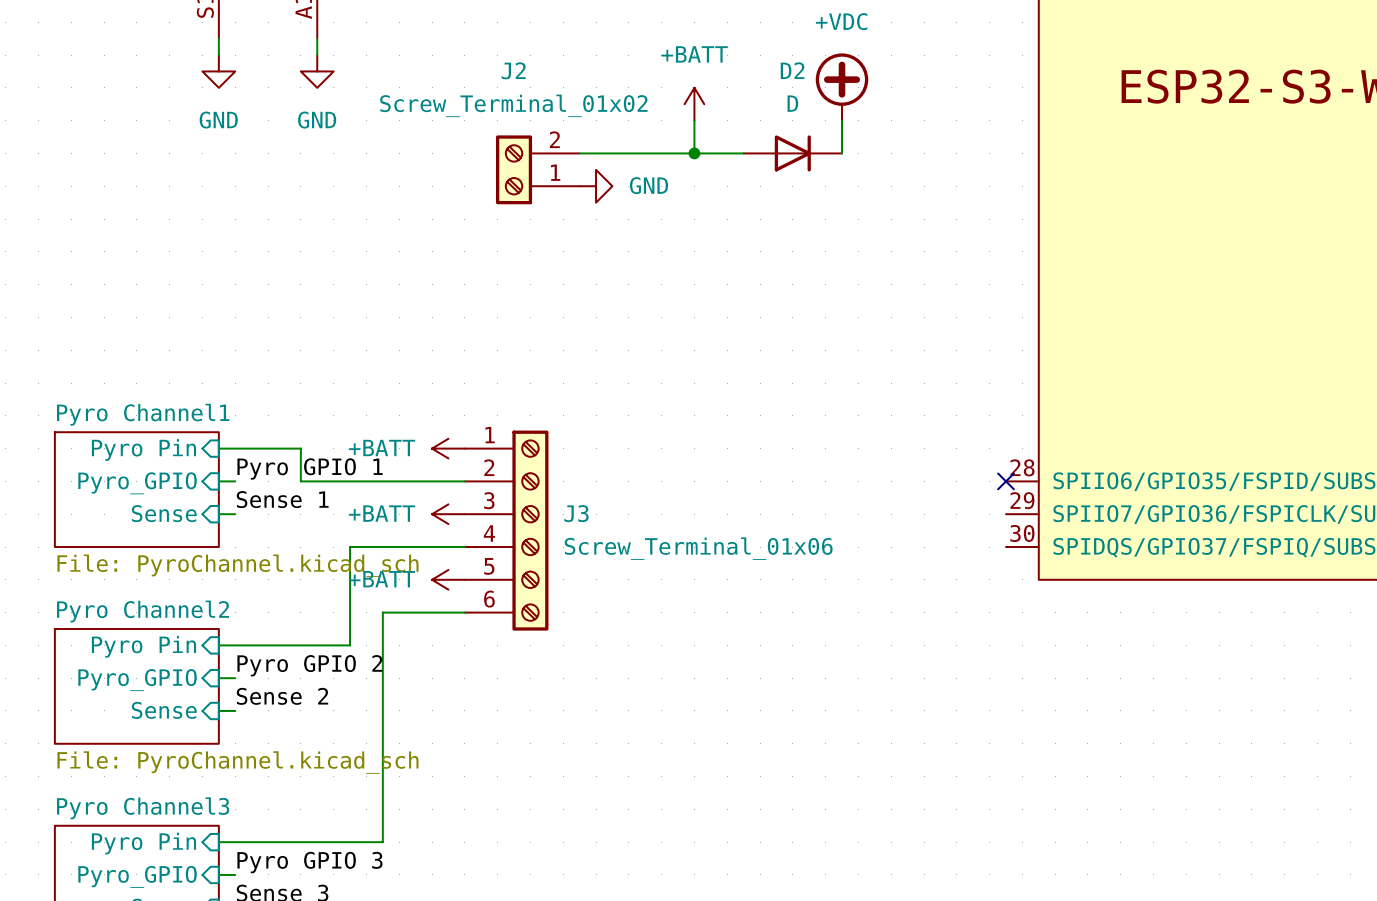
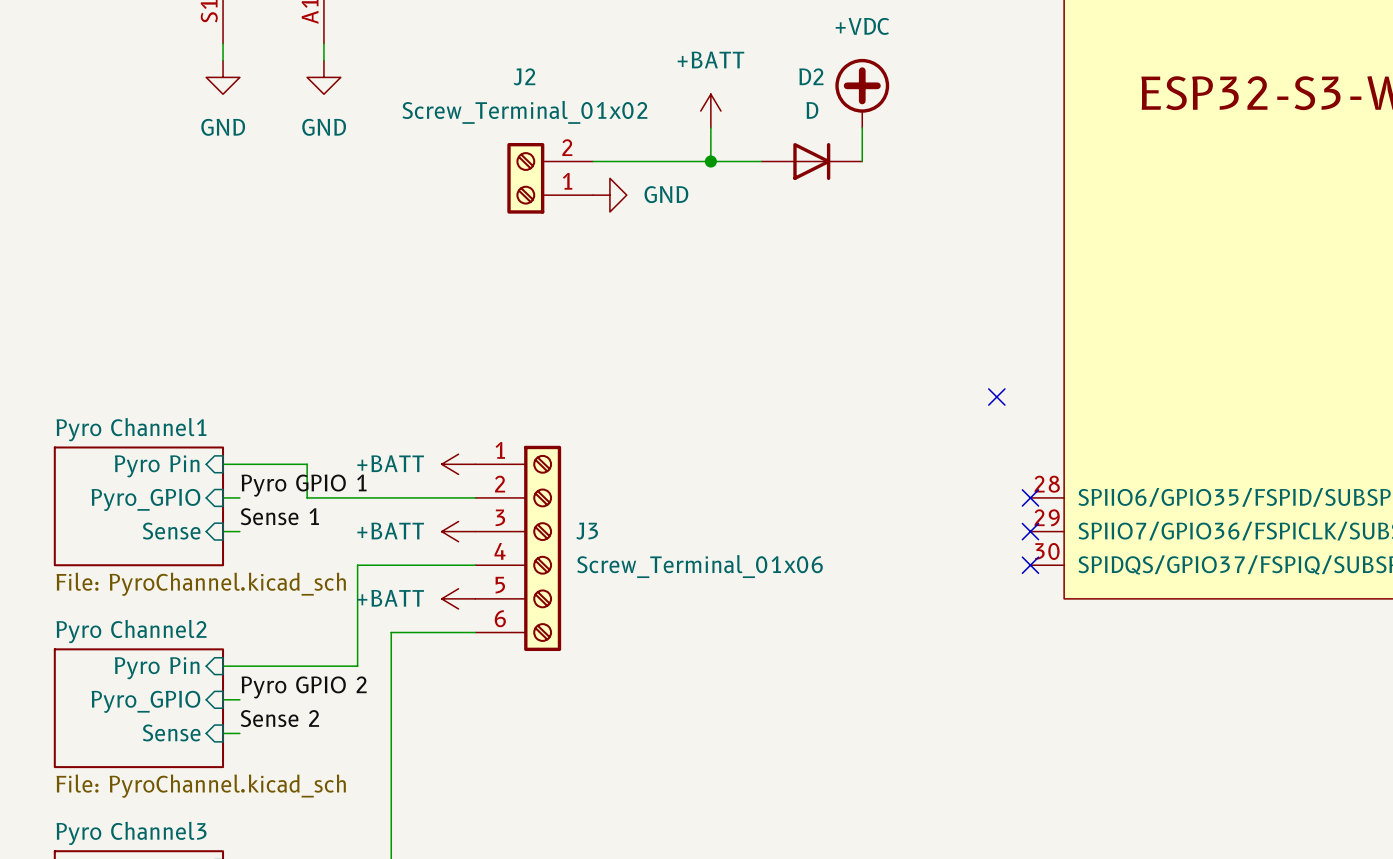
no-connect mark: none -> (996, 397)
no-connect mark: none -> (1030, 531)
no-connect mark: none -> (1030, 565)

